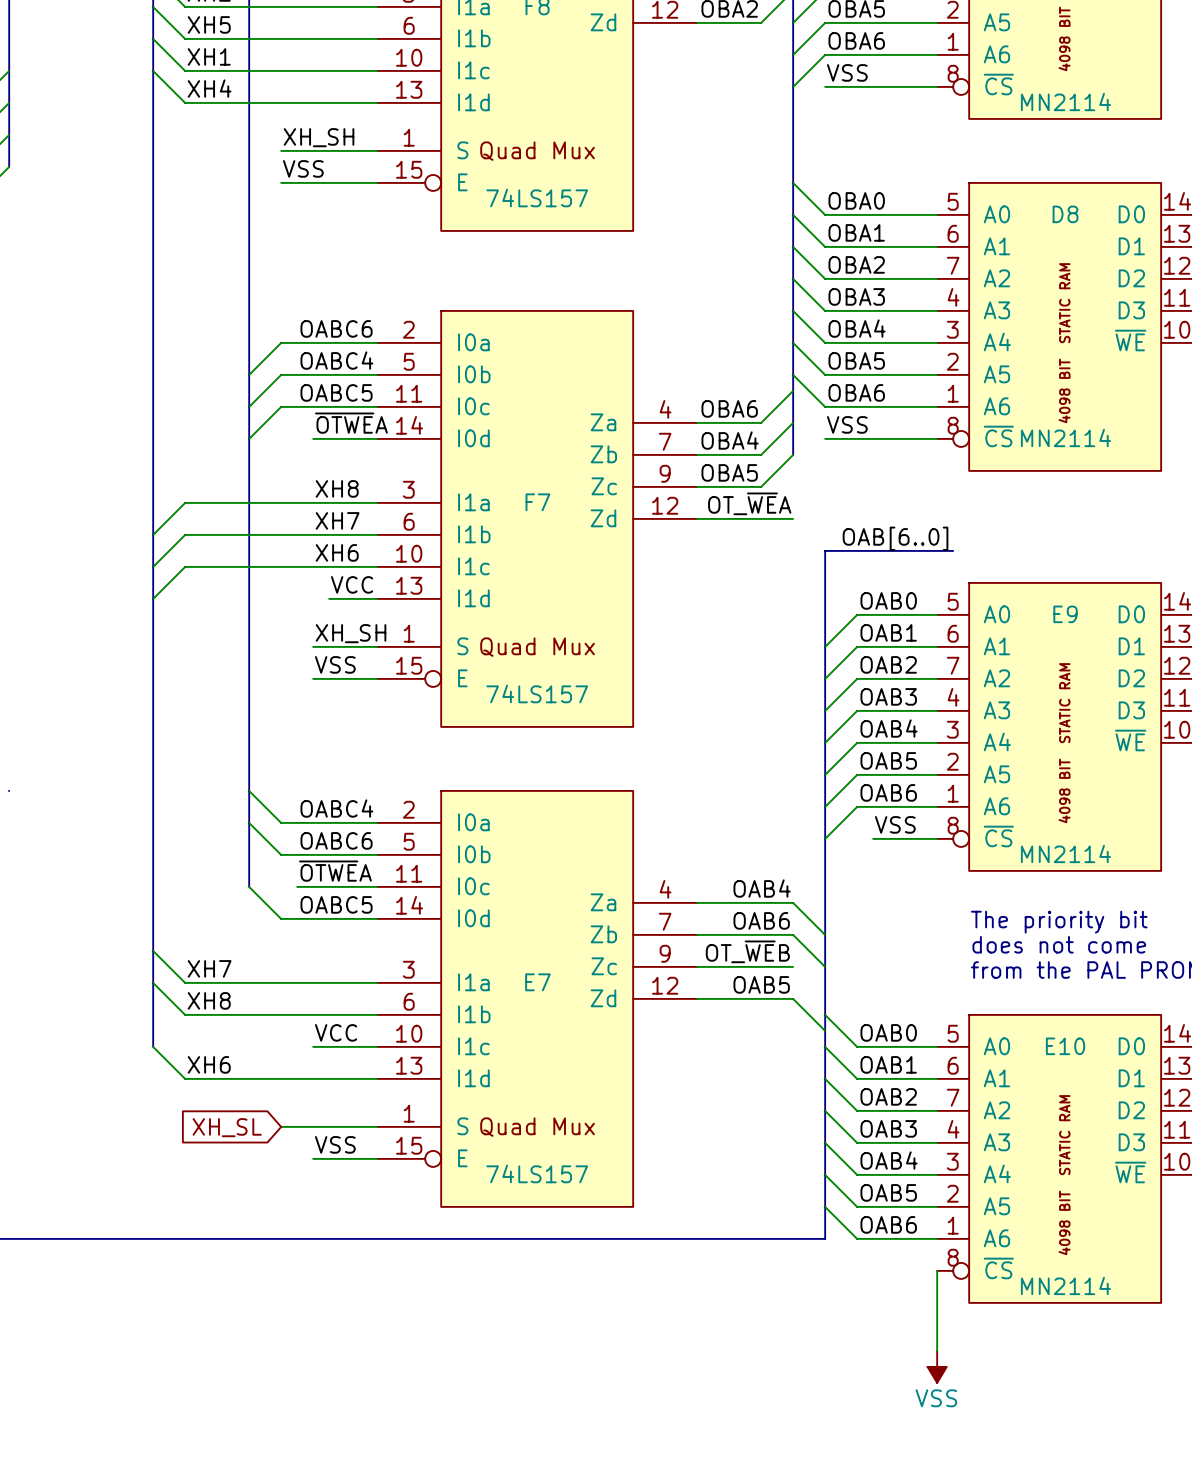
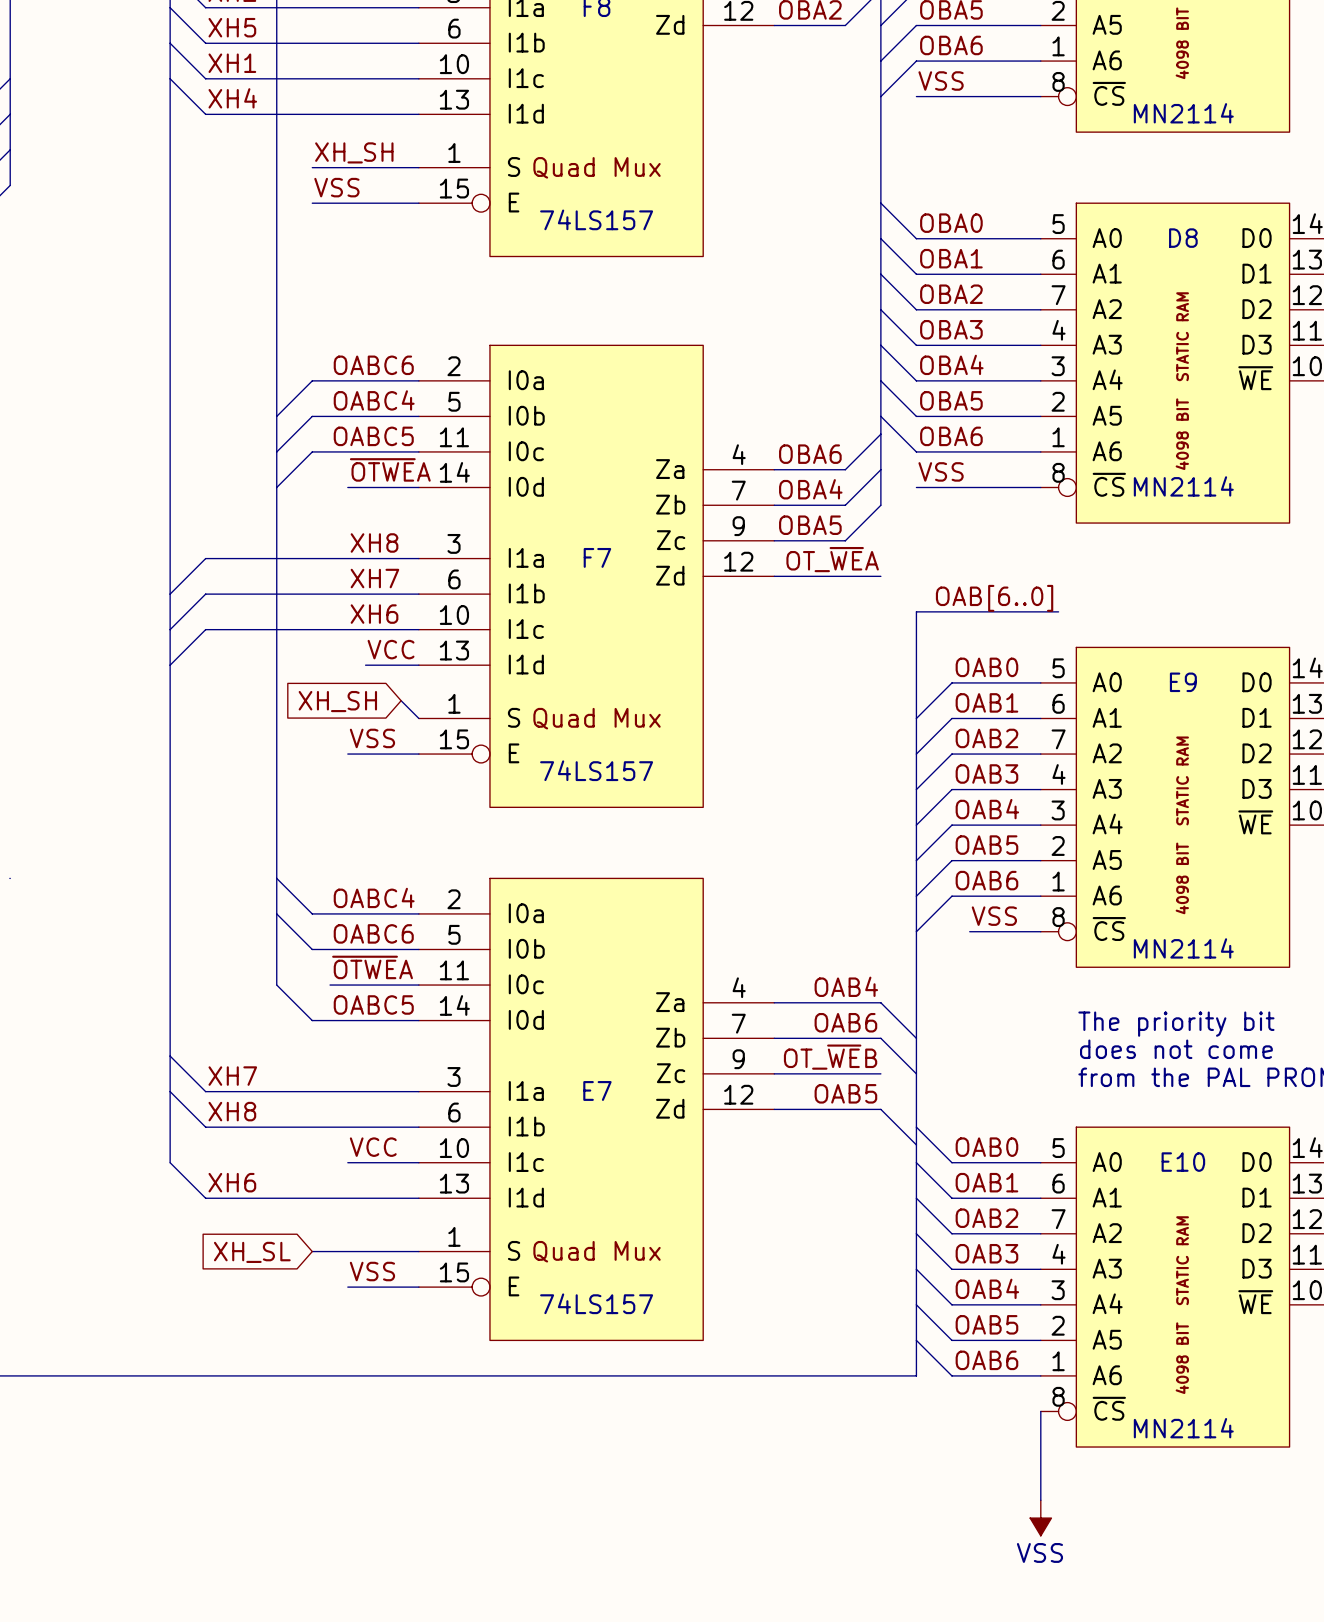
global label: none -> XH_SH (337, 701)
label: XH_SH (351, 633) -> none
wire: (313, 646) (377, 646) -> (401, 700) (418, 718)

